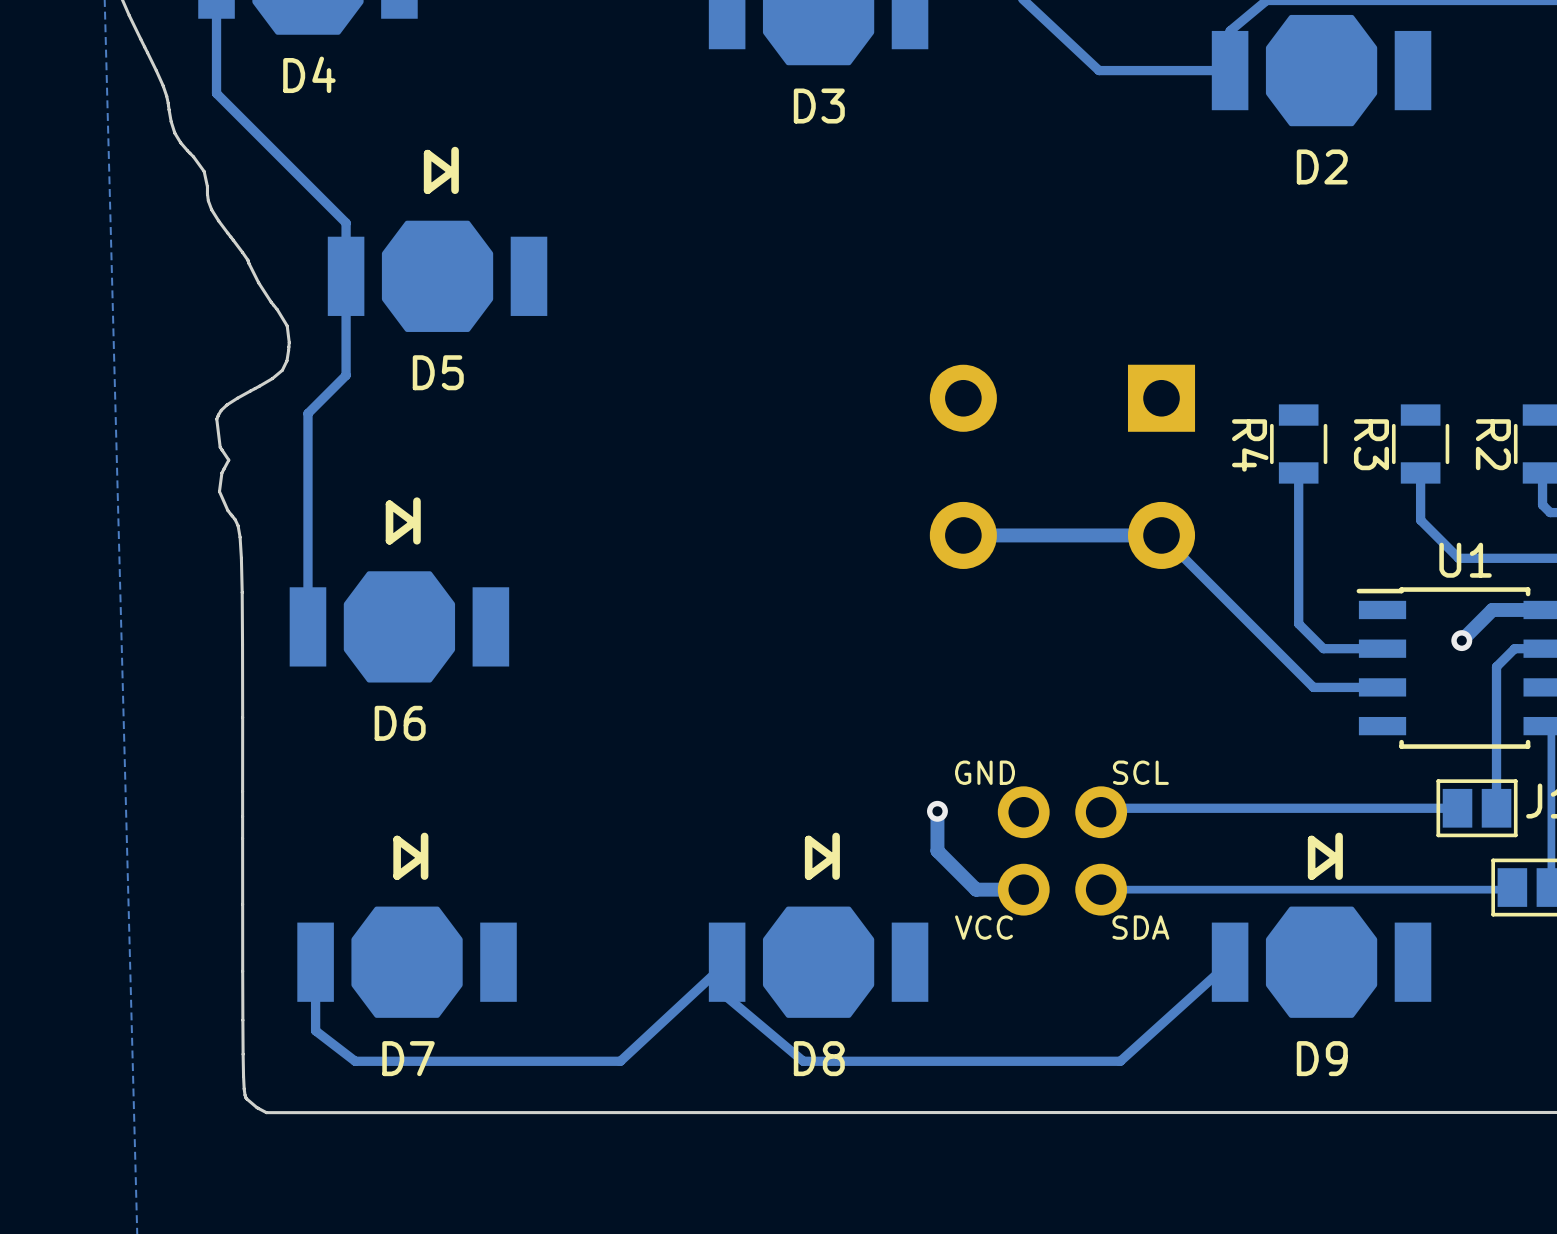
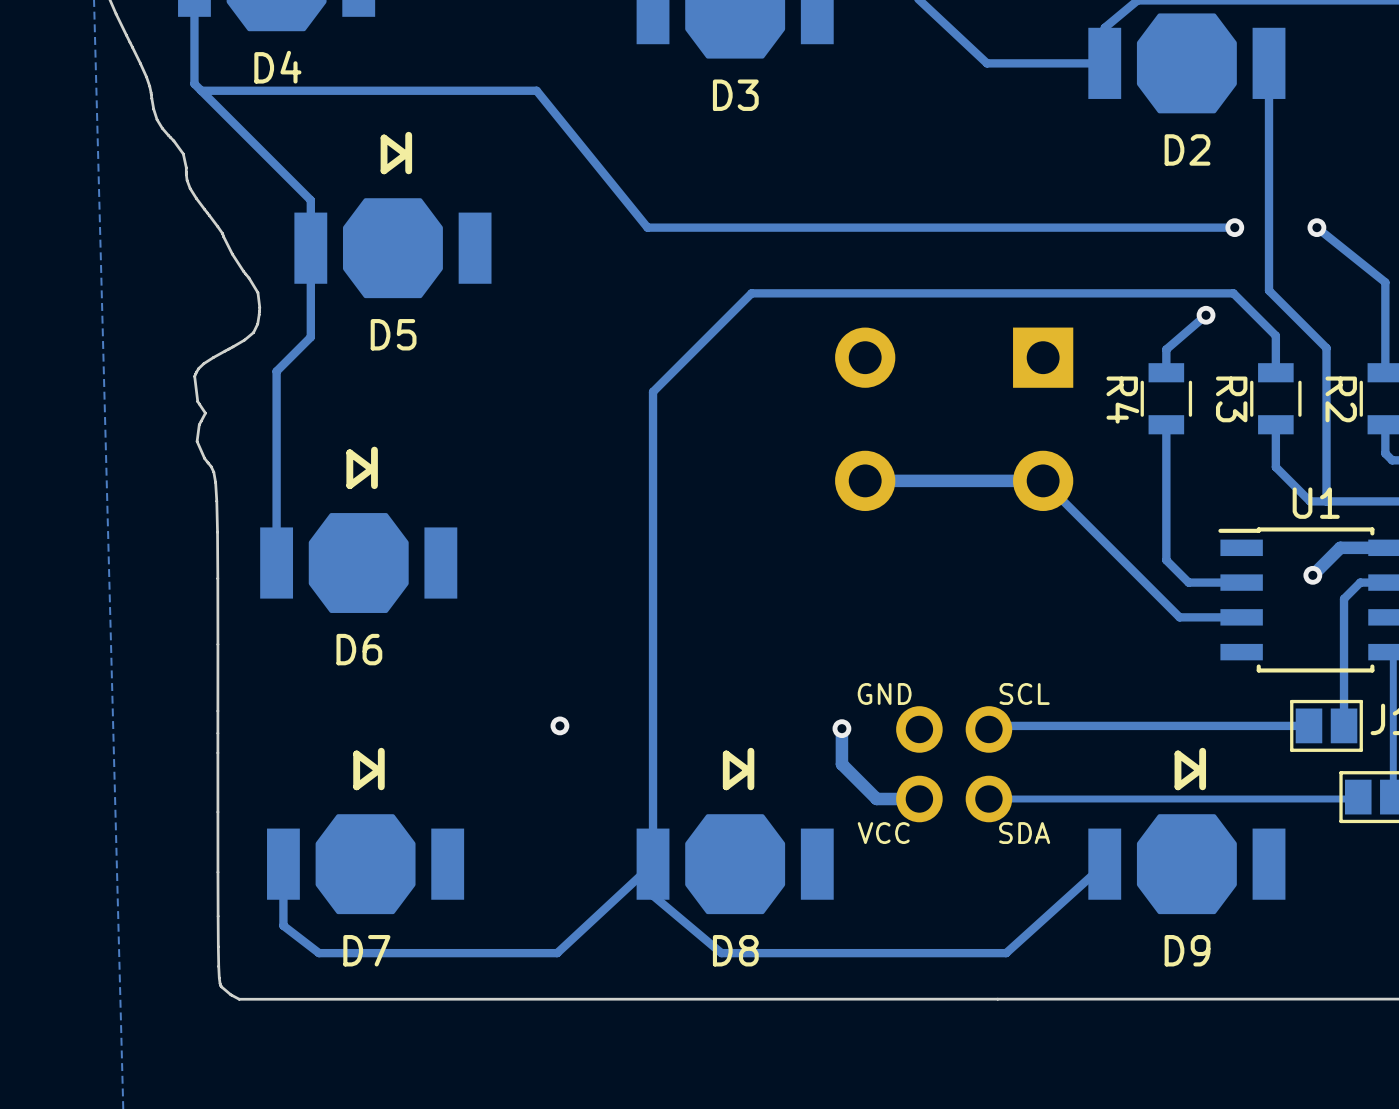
track: none -> (1269, 63) (1269, 290) (1326, 348) (1326, 501)
track: none -> (201, 90) (536, 90) (647, 227) (1234, 227)
via: none -> (1234, 227)
track: none -> (1316, 227) (1385, 282) (1385, 372)
via: none -> (1316, 227)
track: none -> (1206, 315) (1166, 349) (1166, 372)
via: none -> (1206, 315)
track: none -> (1275, 372) (1275, 335) (1233, 293) (751, 293) (653, 391) (653, 864)
via: none -> (559, 725)

